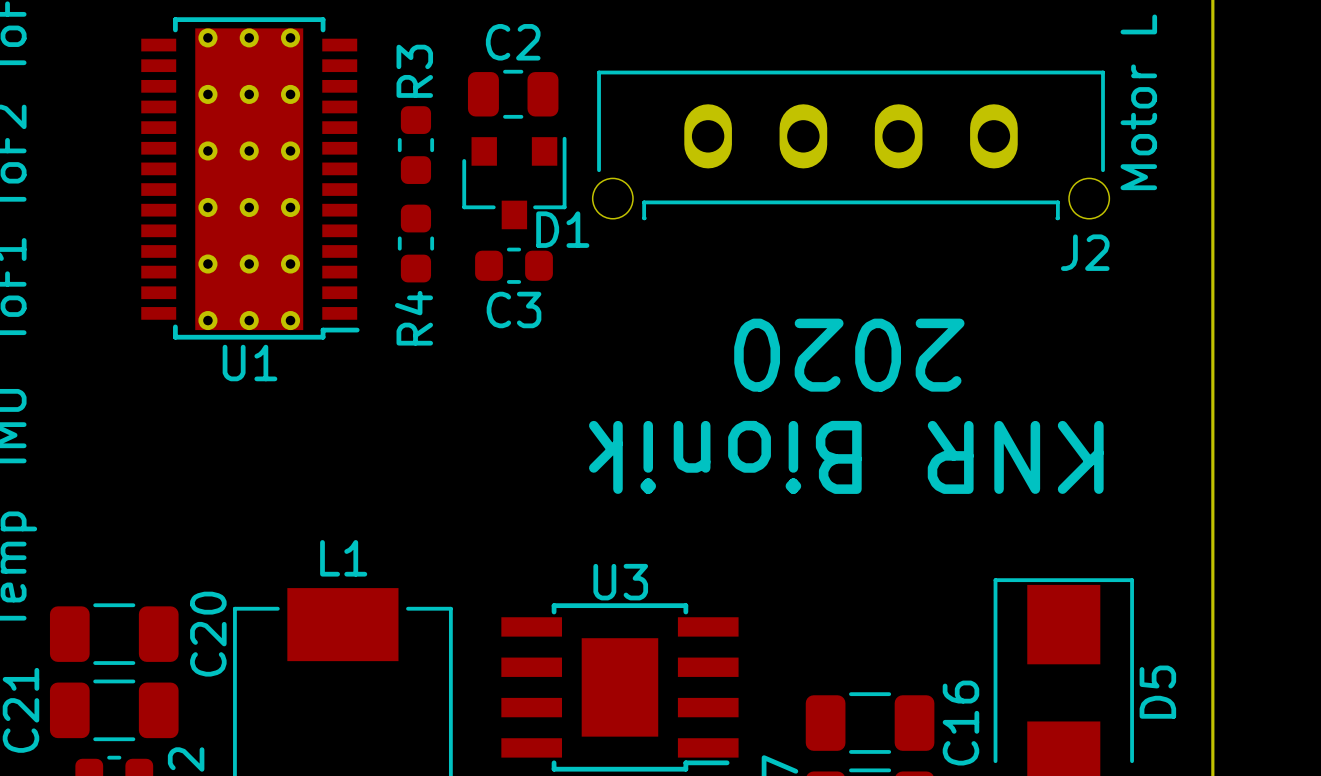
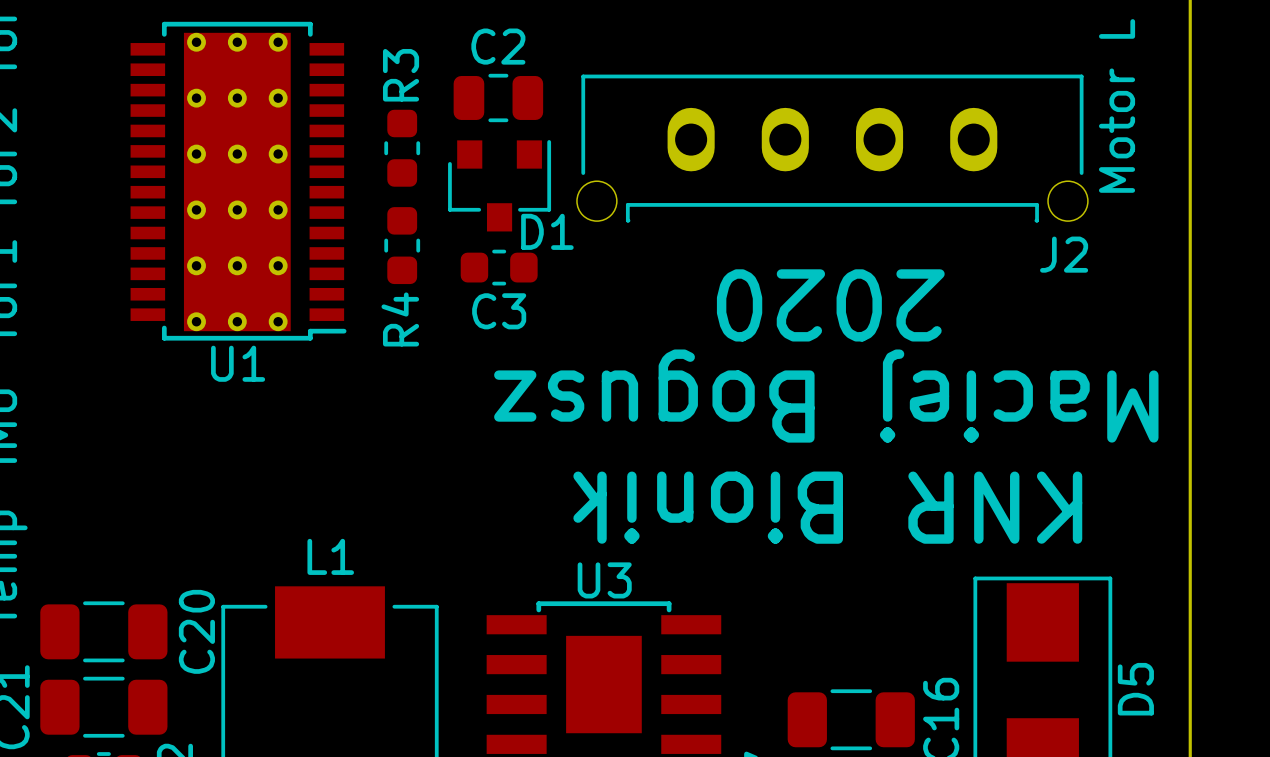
text position: 2020 (849, 355) -> 2020 (830, 305)
text: none -> Maciej Bogusz (826, 396)
text position: KNR Bionik (846, 457) -> KNR Bionik (827, 507)

